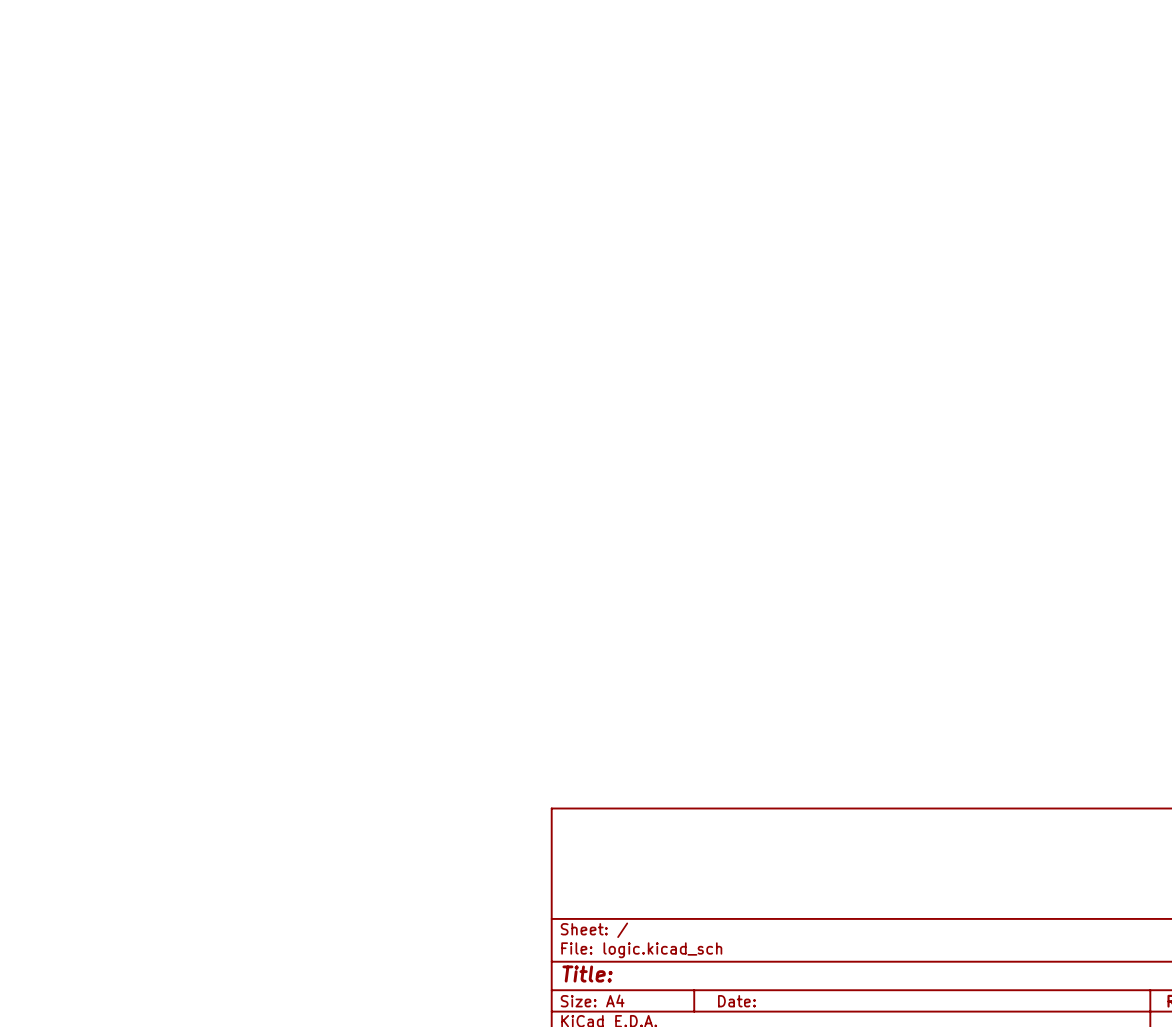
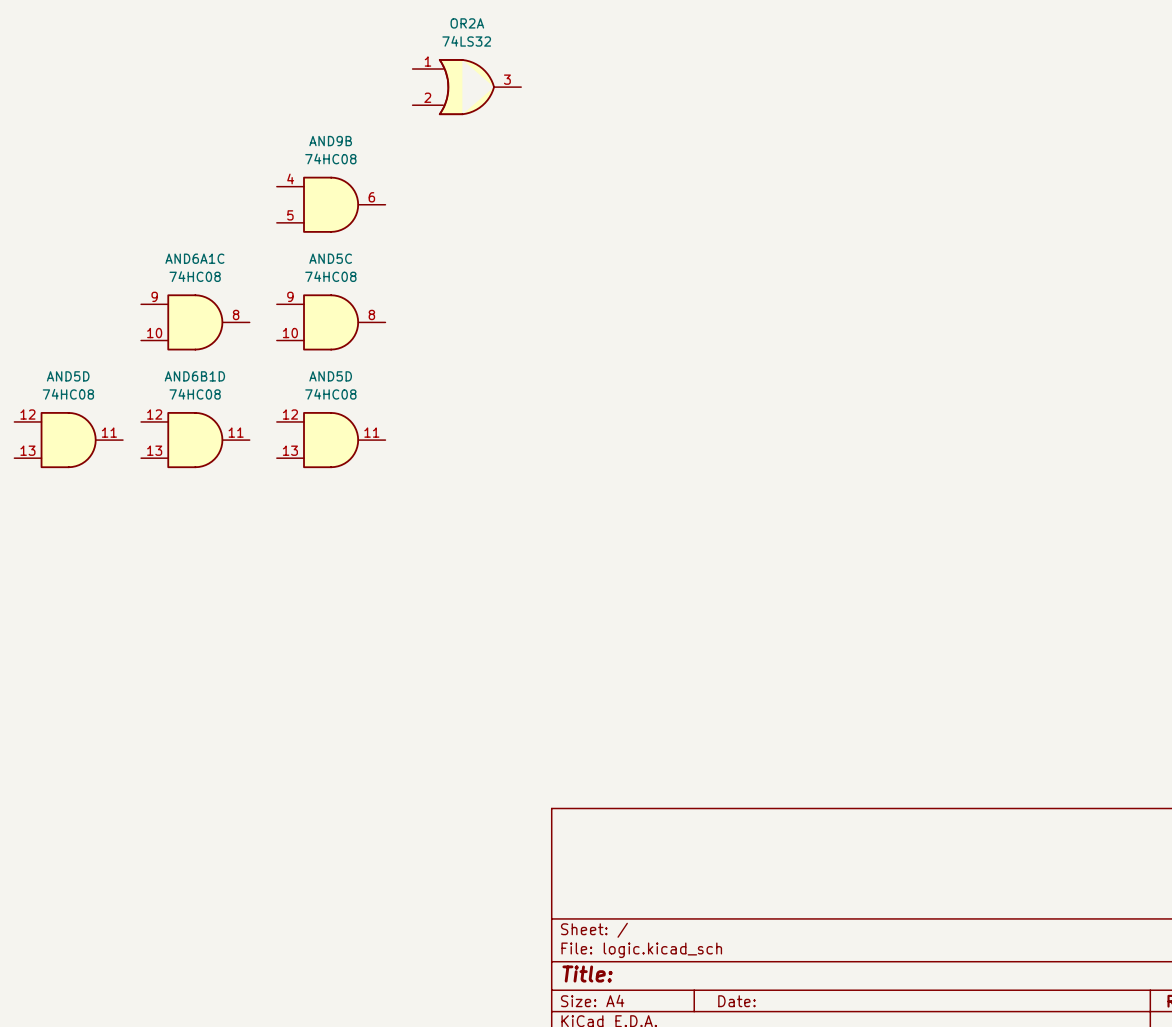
OR2A: none -> 74LS32 (466, 87)
AND9B: none -> 74HC08 (331, 204)
AND6A1C: none -> 74HC08 (195, 322)
AND5C: none -> 74HC08 (331, 322)
AND5D: none -> 74HC08 (68, 440)
AND6B1D: none -> 74HC08 (195, 440)
AND5D: none -> 74HC08 (331, 440)

